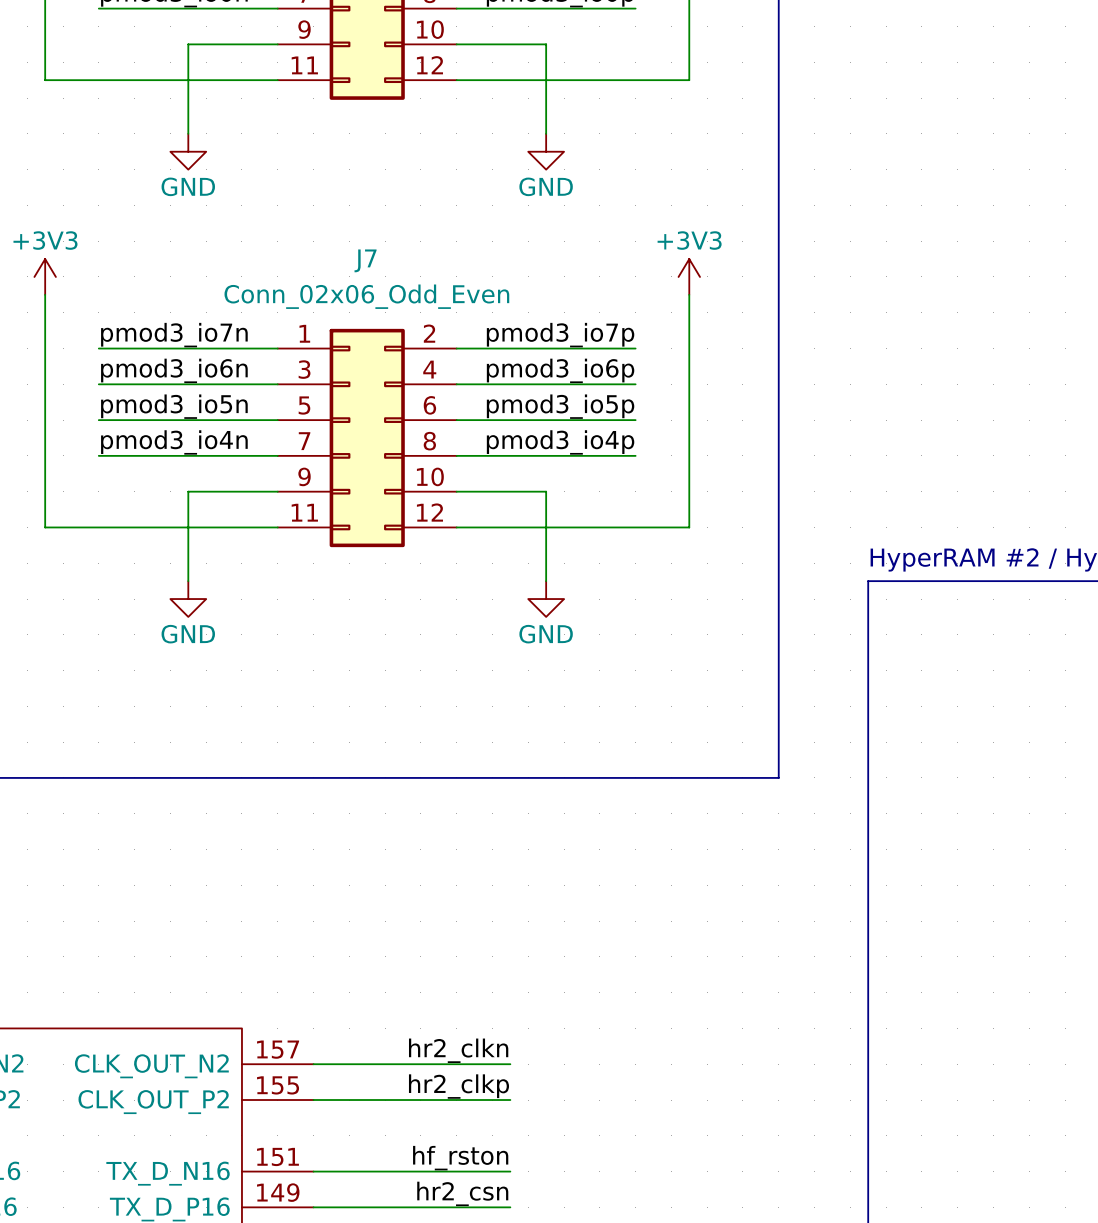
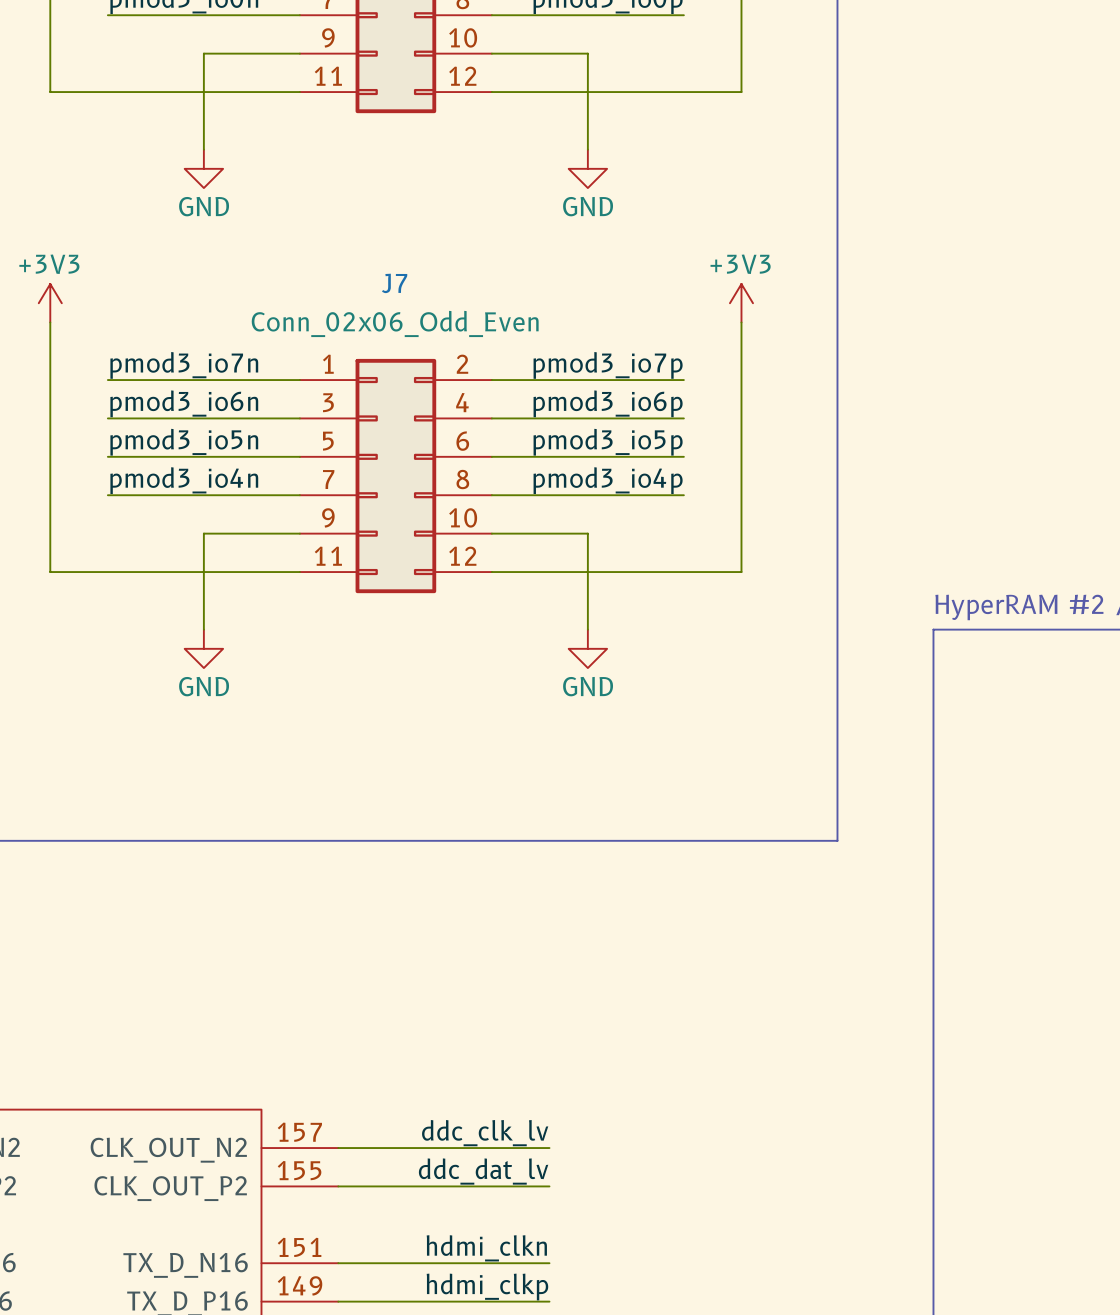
label: hr2_clkn (458, 1050) -> ddc_clk_lv (485, 1133)
label: hr2_clkp (458, 1086) -> ddc_dat_lv (483, 1171)
label: hf_rston (460, 1158) -> hdmi_clkn (486, 1248)
label: hr2_csn (462, 1193) -> hdmi_clkp (487, 1287)

